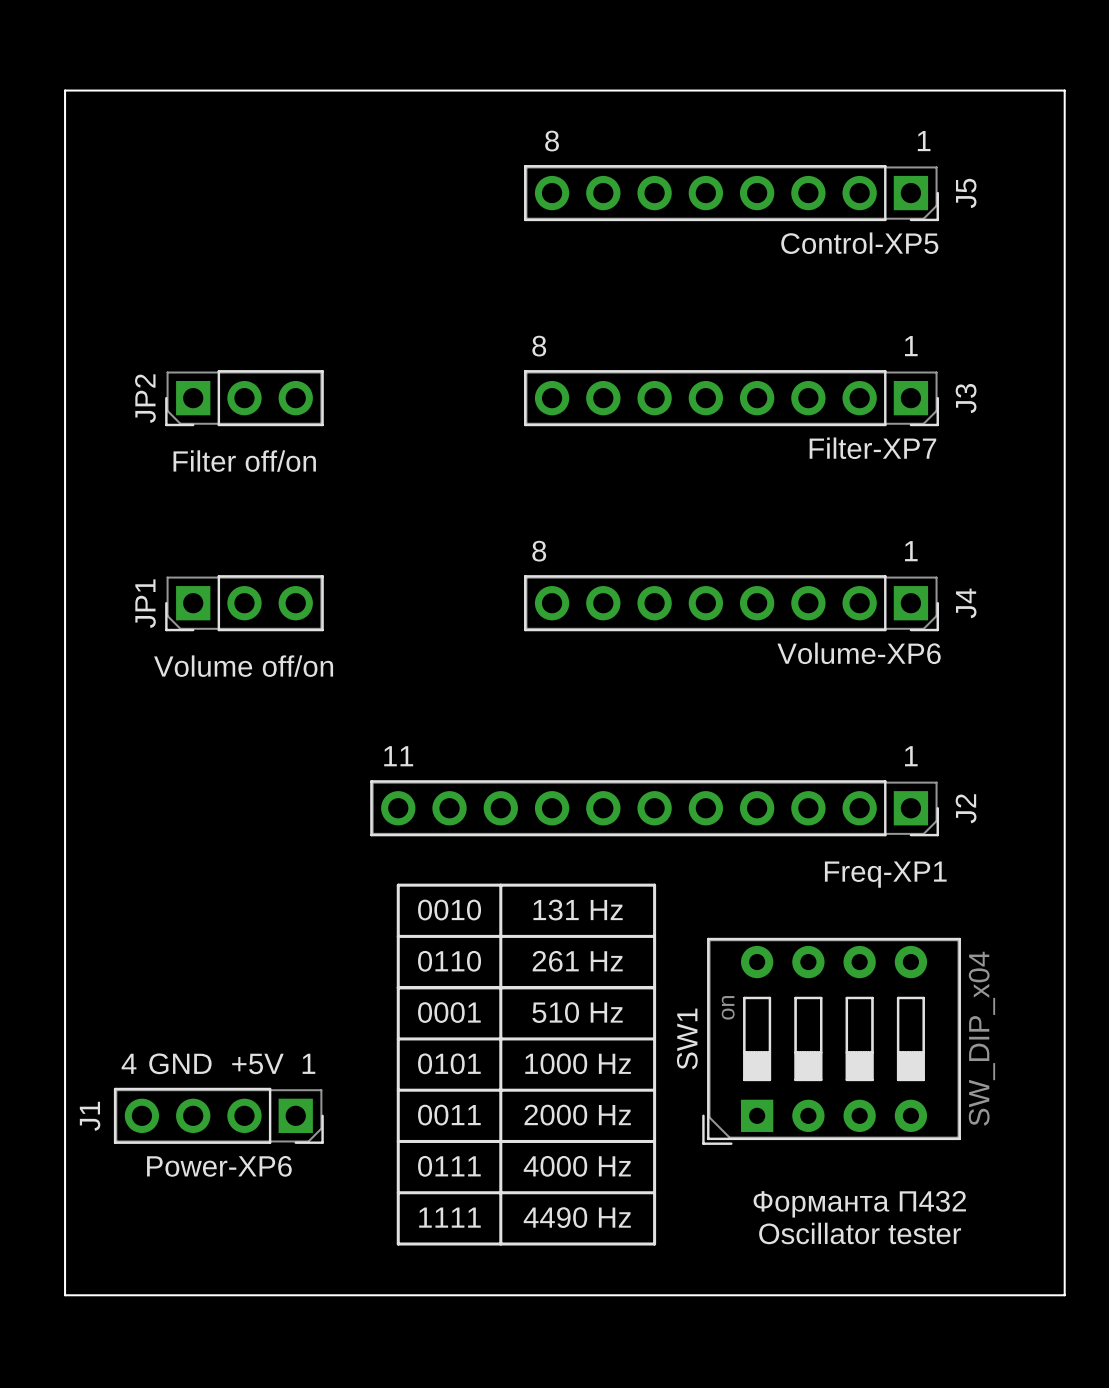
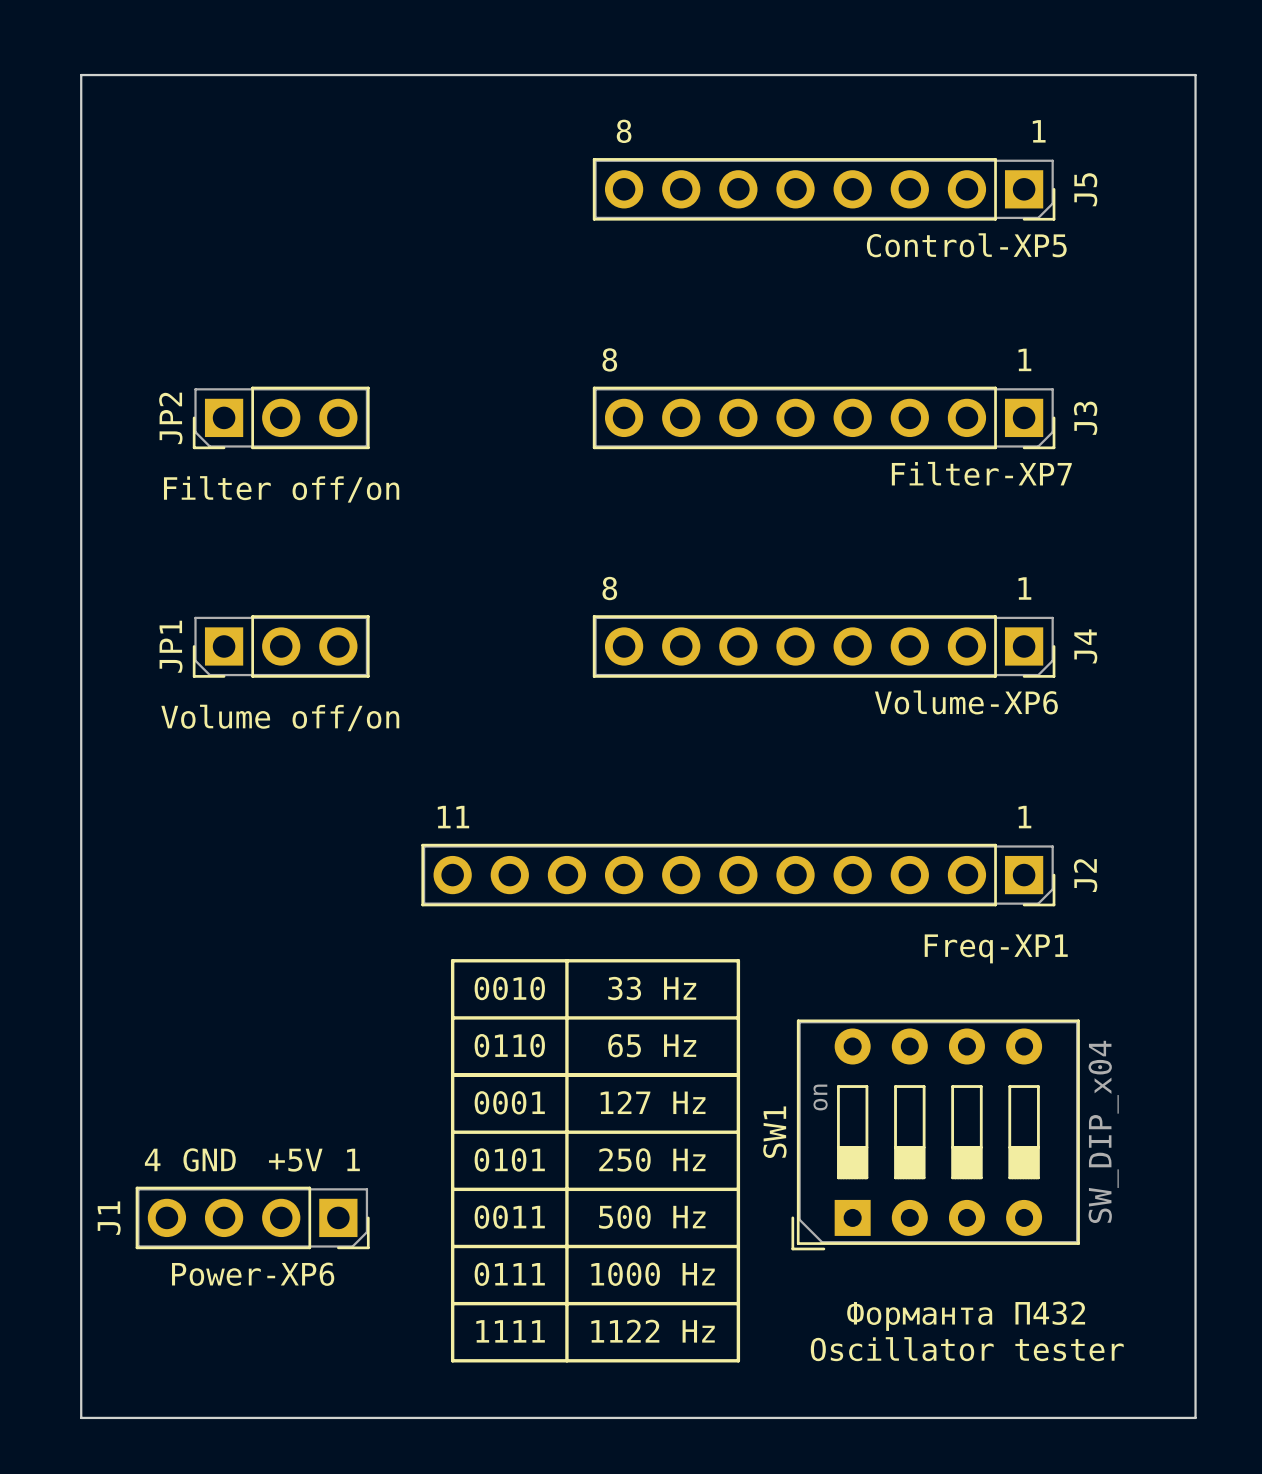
text: 131 Hz (578, 910) -> 33 Hz (652, 988)
text: 261 Hz (577, 961) -> 65 Hz (652, 1045)
text: 510 Hz (577, 1012) -> 127 Hz (653, 1102)
text: 1000 Hz (578, 1063) -> 250 Hz (652, 1159)
text: 2000 Hz (577, 1115) -> 500 Hz (652, 1217)
text: 4000 Hz (577, 1166) -> 1000 Hz (653, 1274)
text: 4490 Hz (577, 1217) -> 1122 Hz (653, 1331)

